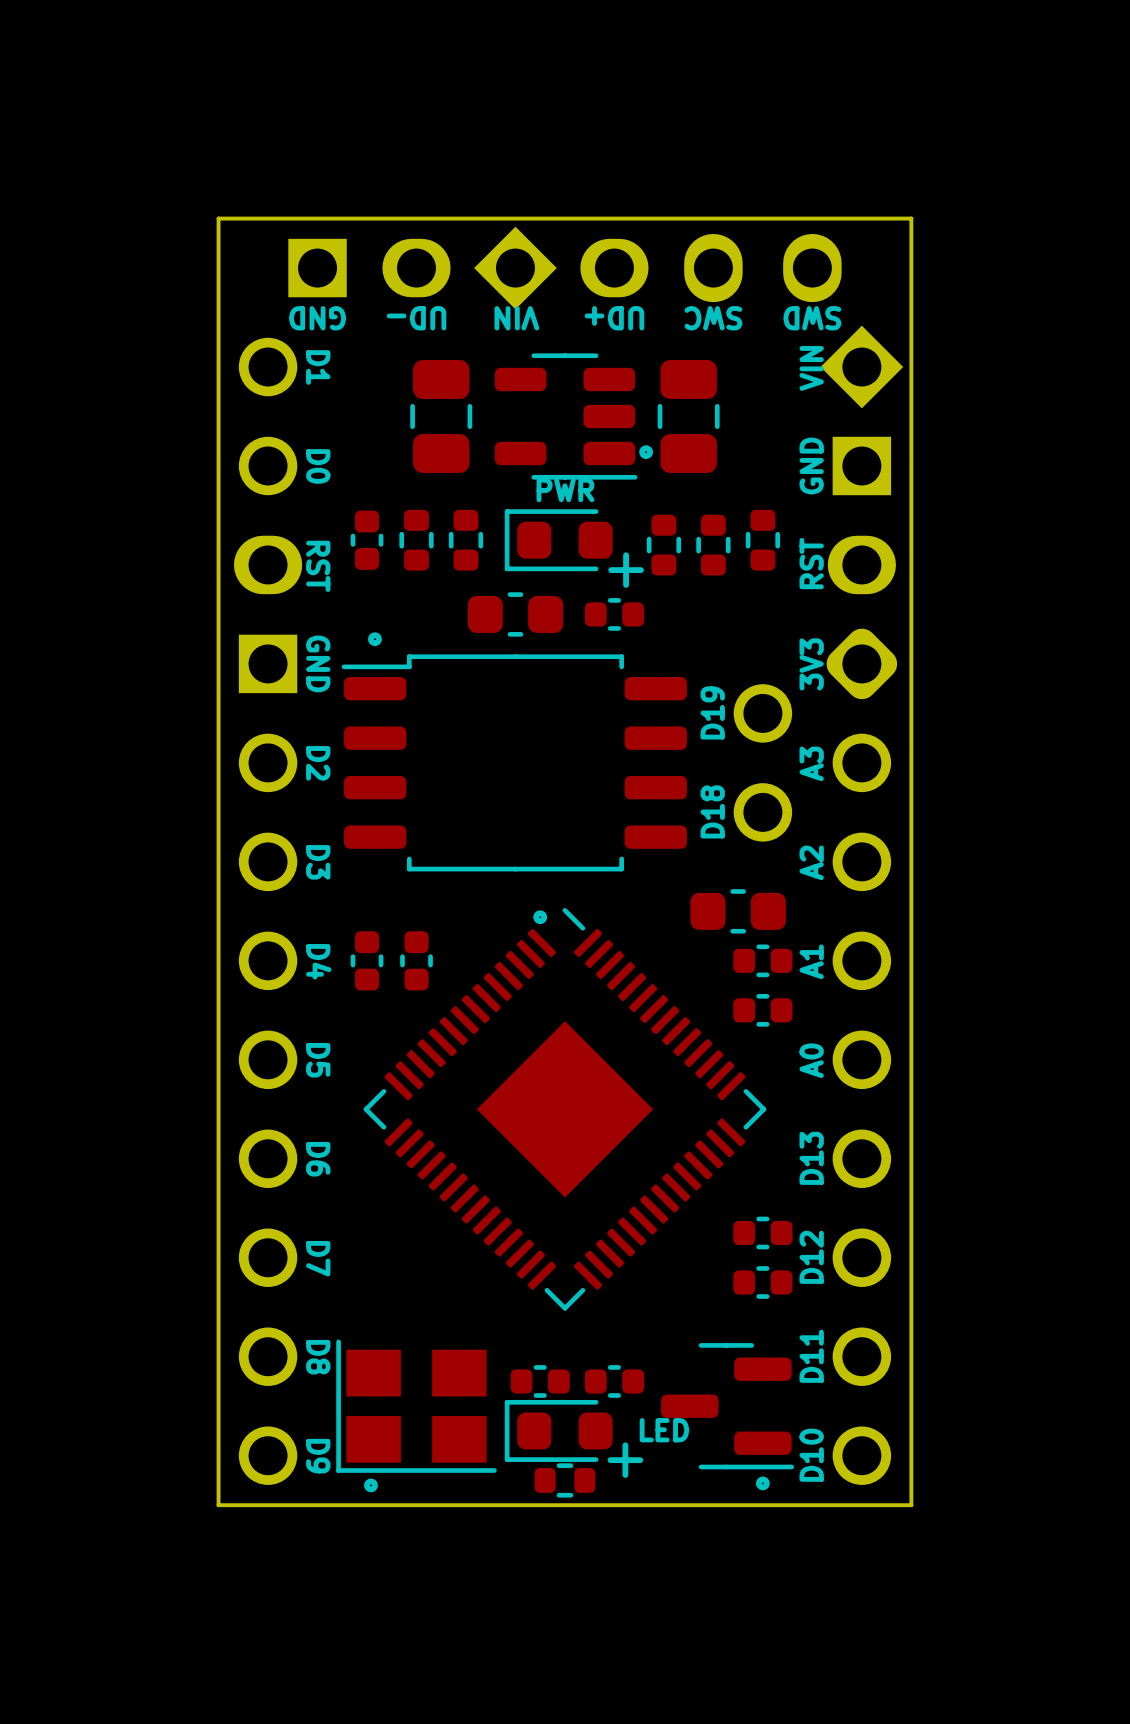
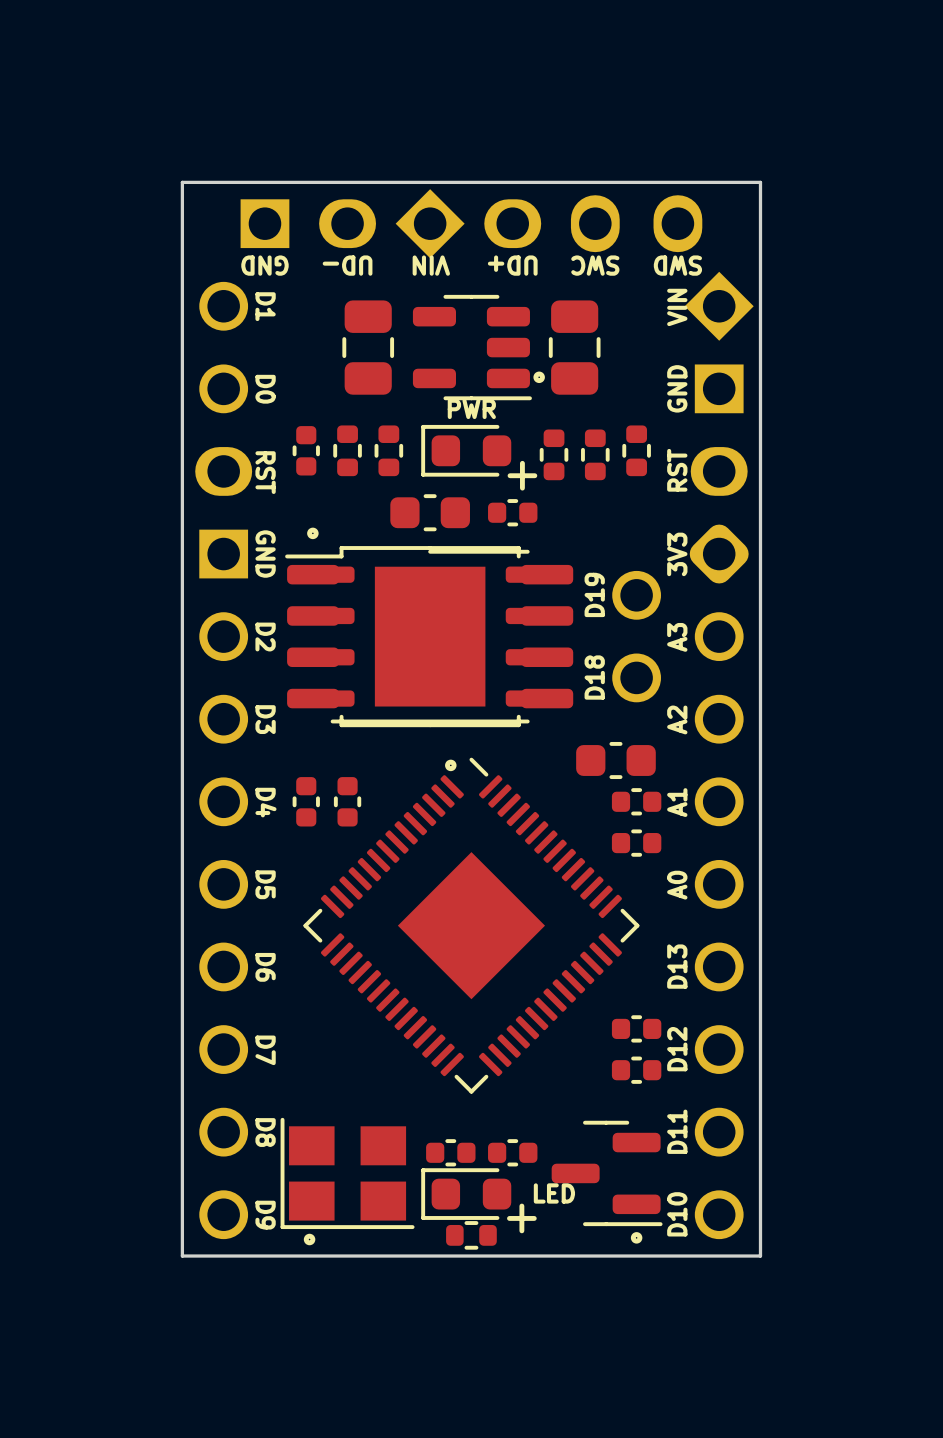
part: none -> (430, 636)

